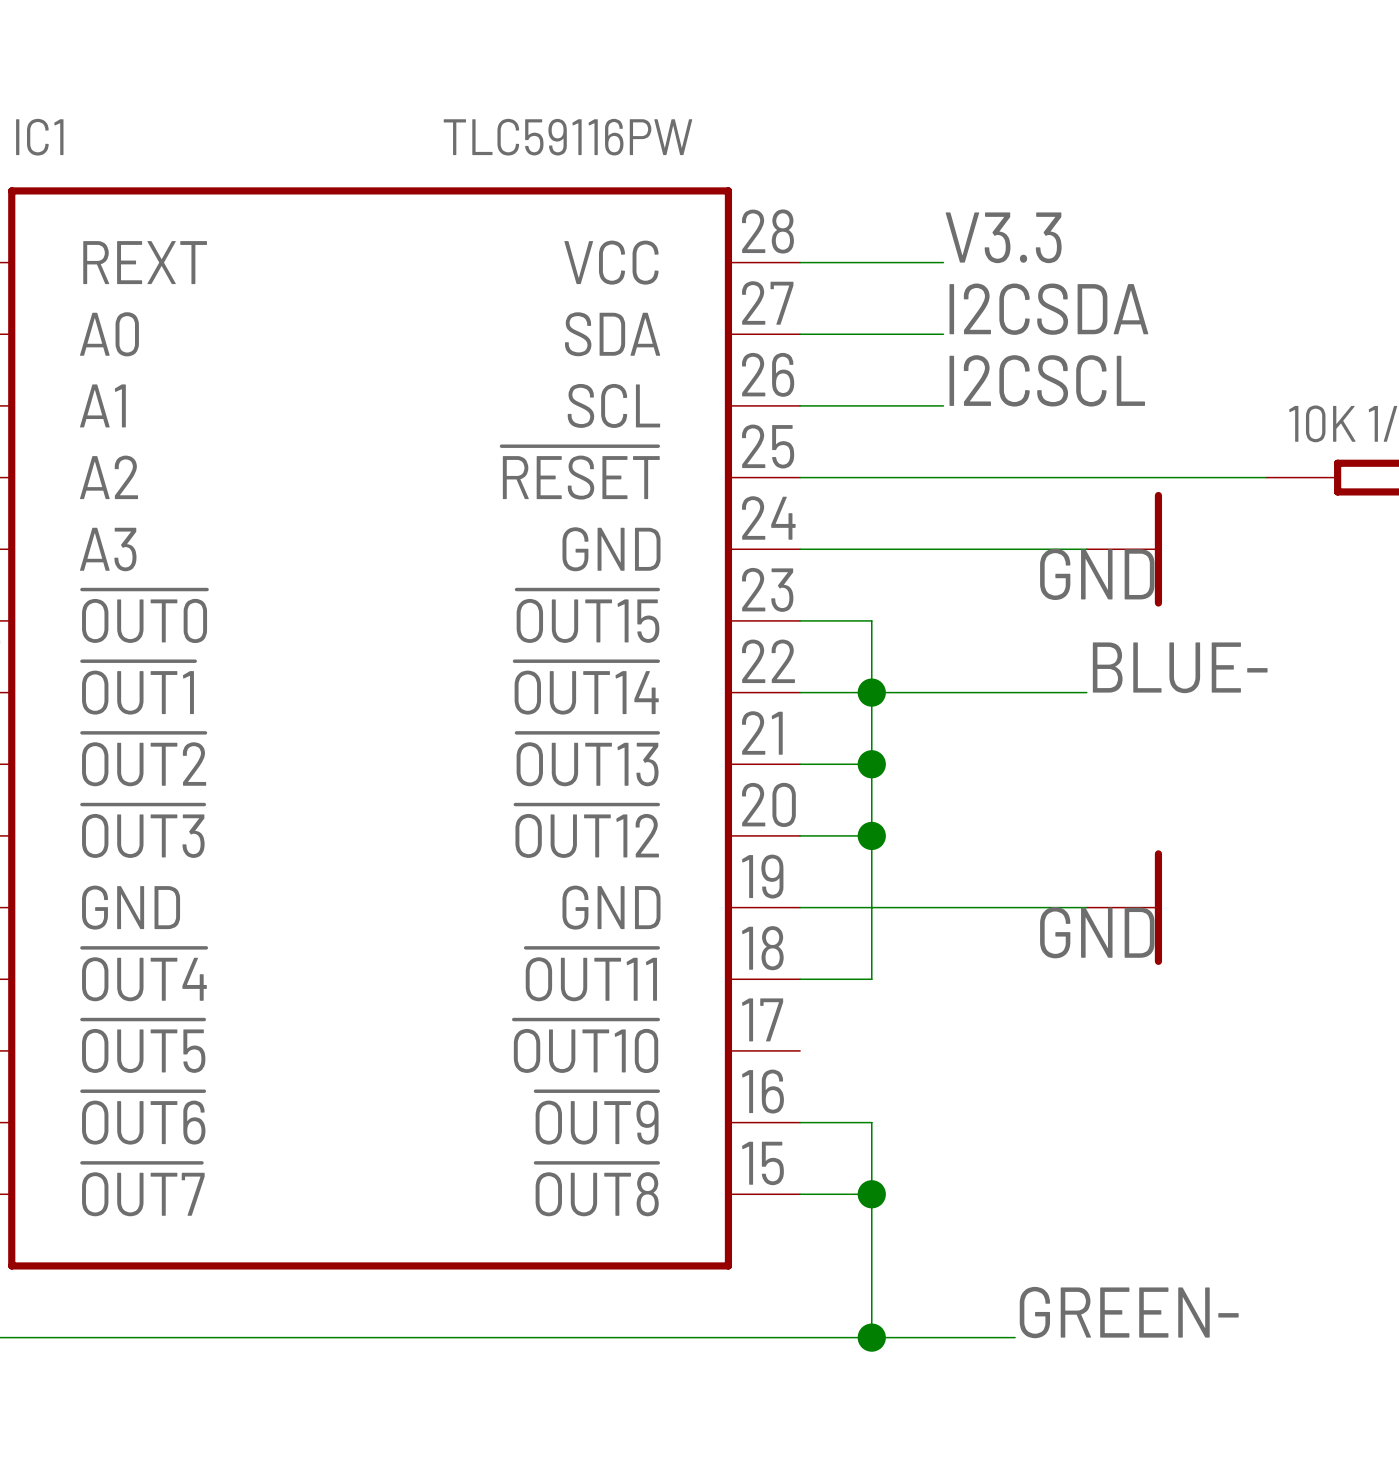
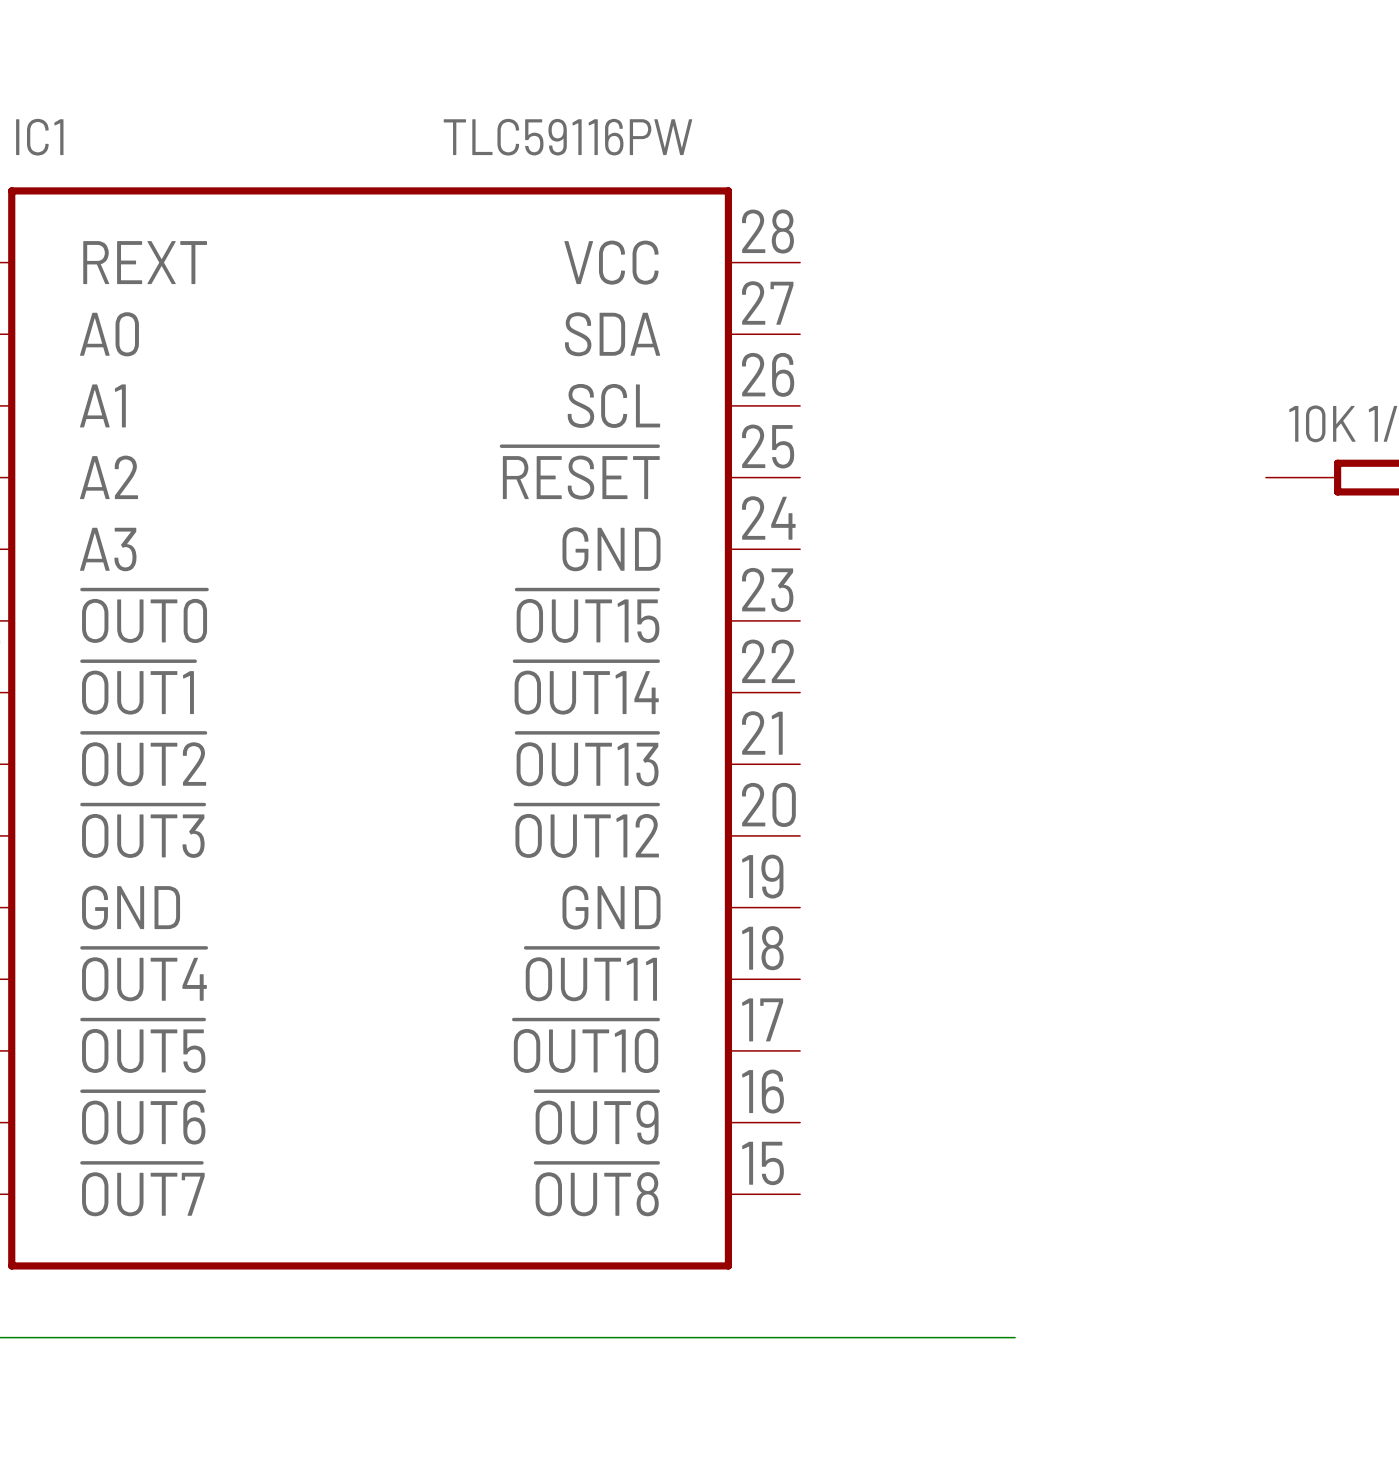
label: V3.3 (1003, 237) -> none
wire: (800, 262) (943, 262) -> none
label: I2CSDA (1048, 309) -> none
wire: (800, 334) (943, 334) -> none
label: I2CSCL (1047, 380) -> none
wire: (800, 405) (943, 405) -> none
wire: (800, 477) (1265, 477) -> none
wire: (800, 549) (1086, 549) -> none
power symbol: GND (1124, 549) -> none
wire: (800, 620) (871, 620) (871, 979) (800, 979) -> none
label: BLUE- (1180, 667) -> none
wire: (800, 692) (1086, 692) -> none
junction: (871, 692) -> none
wire: (800, 764) (871, 764) -> none
junction: (871, 764) -> none
wire: (800, 835) (871, 835) -> none
junction: (871, 835) -> none
wire: (800, 907) (1086, 907) -> none
power symbol: GND (1124, 907) -> none
wire: (800, 1122) (871, 1122) (871, 1337) -> none
wire: (800, 1194) (871, 1194) -> none
junction: (871, 1194) -> none
label: GREEN- (1129, 1312) -> none
junction: (871, 1337) -> none

